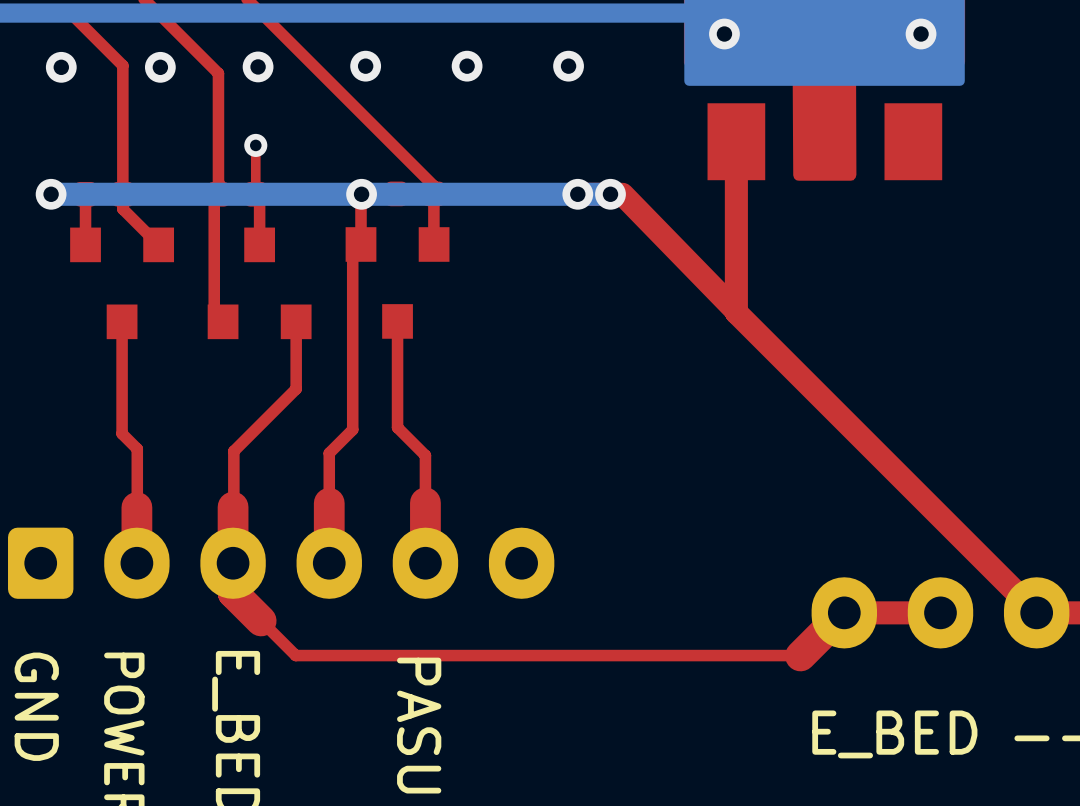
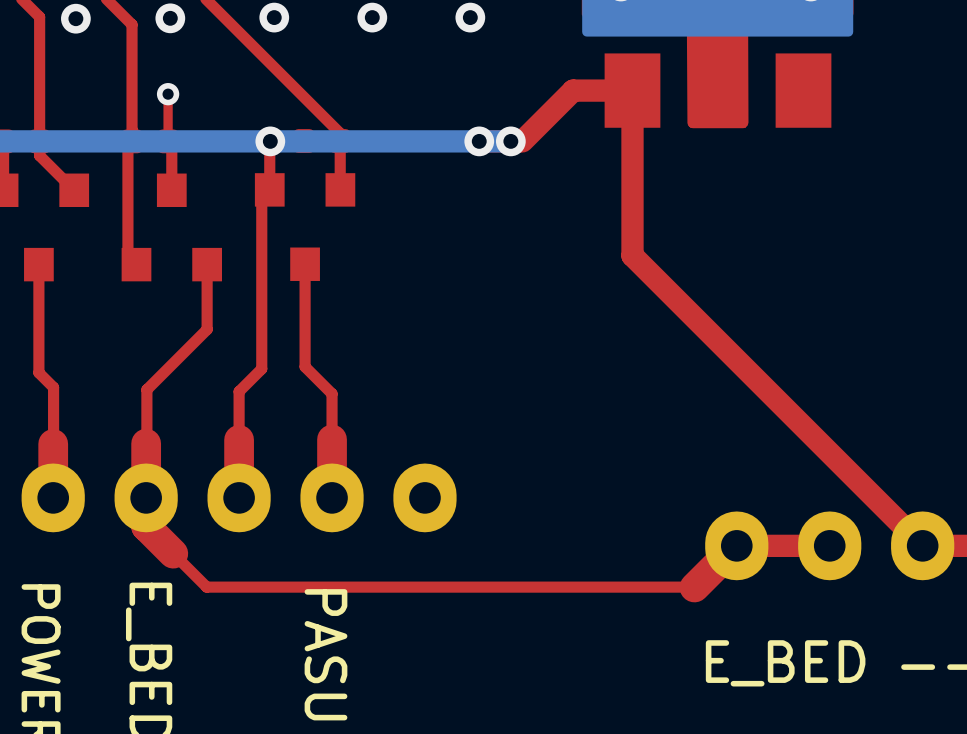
top track: (622, 194) (736, 311) -> (522, 141) (573, 90) (632, 90)

